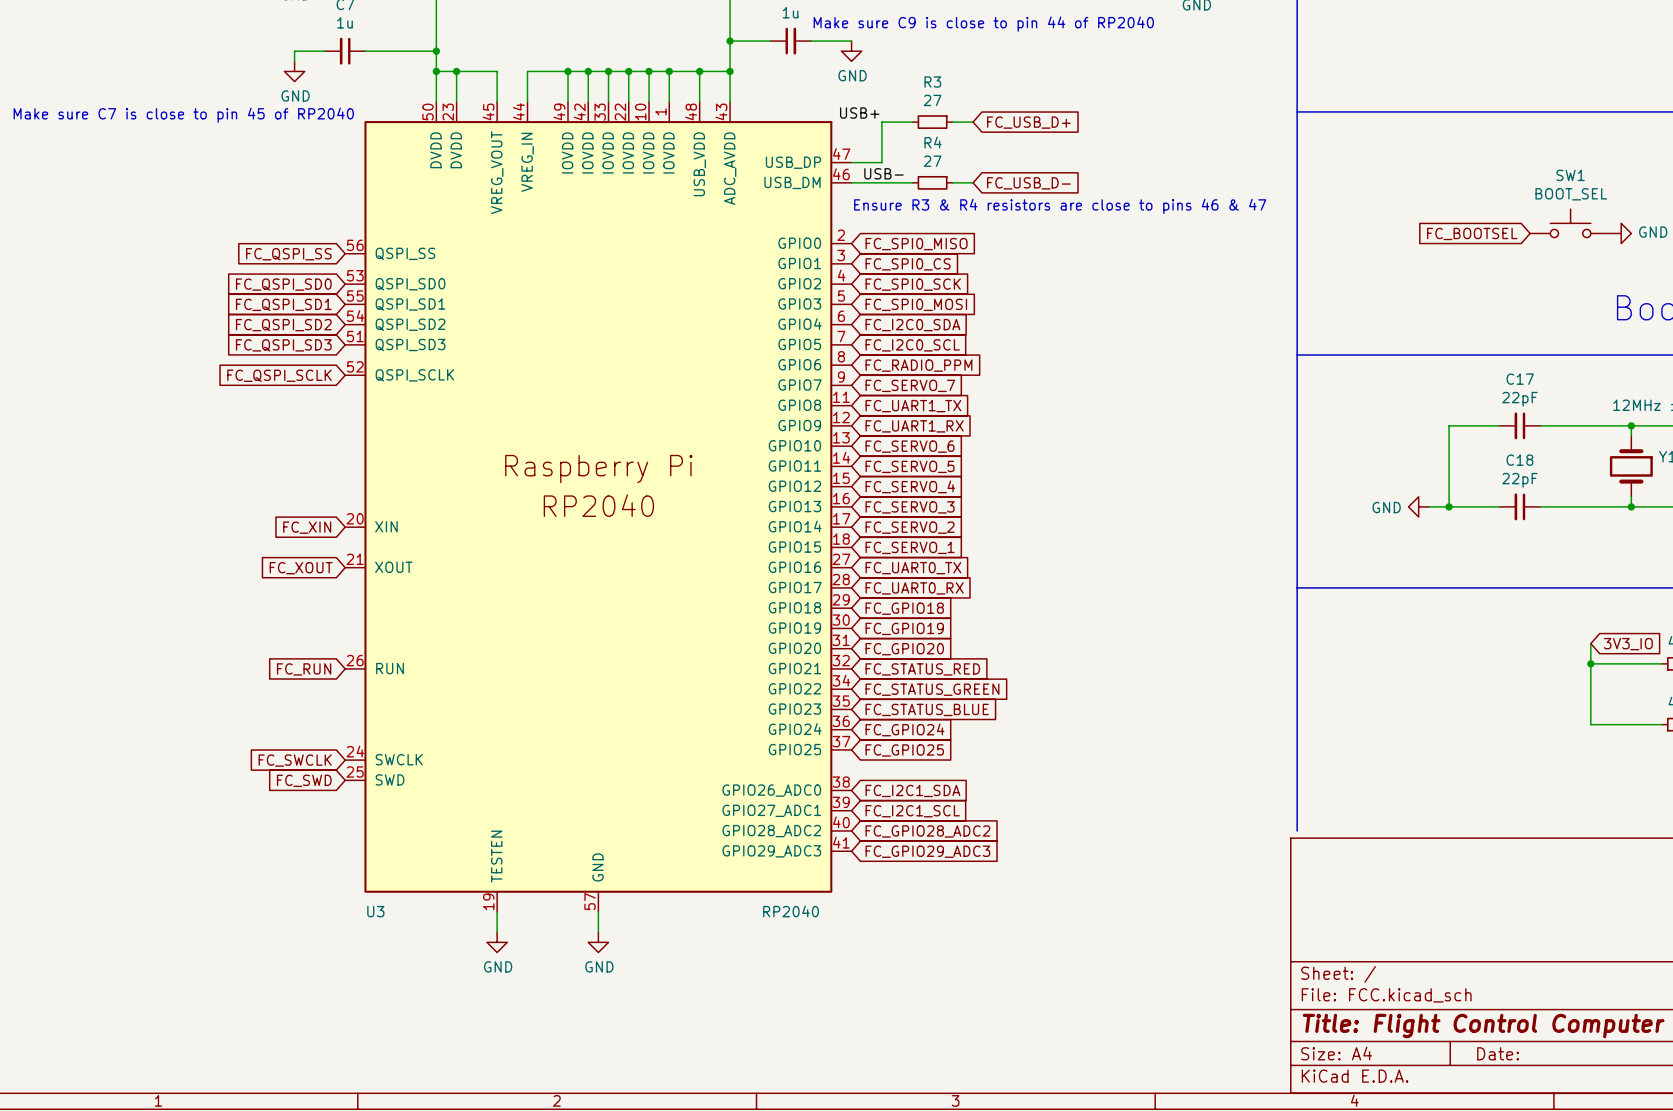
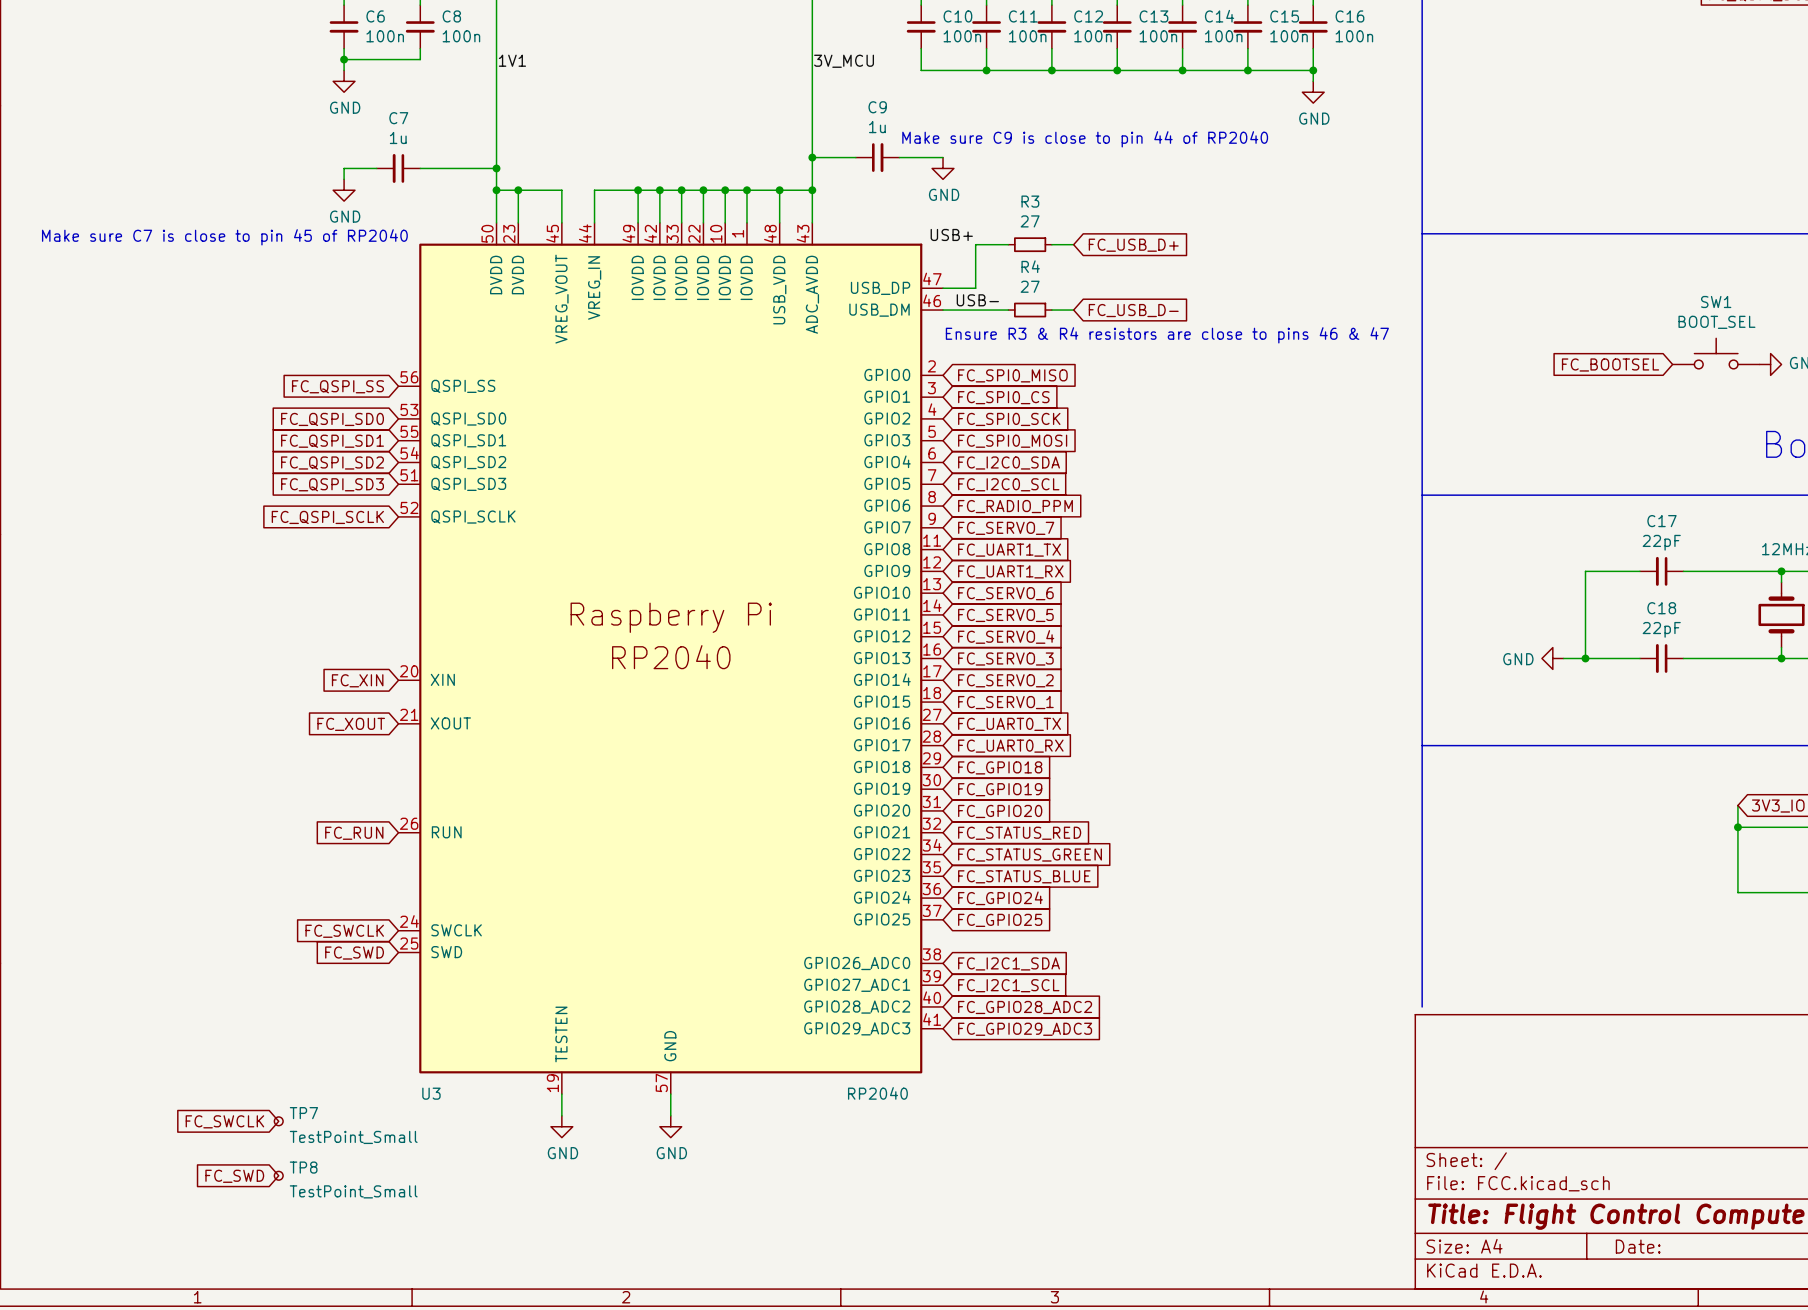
global label: none -> FC_SWCLK (224, 1121)
TP7: none -> TestPoint_Small (278, 1121)
TP8: none -> TestPoint_Small (278, 1175)
global label: none -> FC_SWD (234, 1176)

